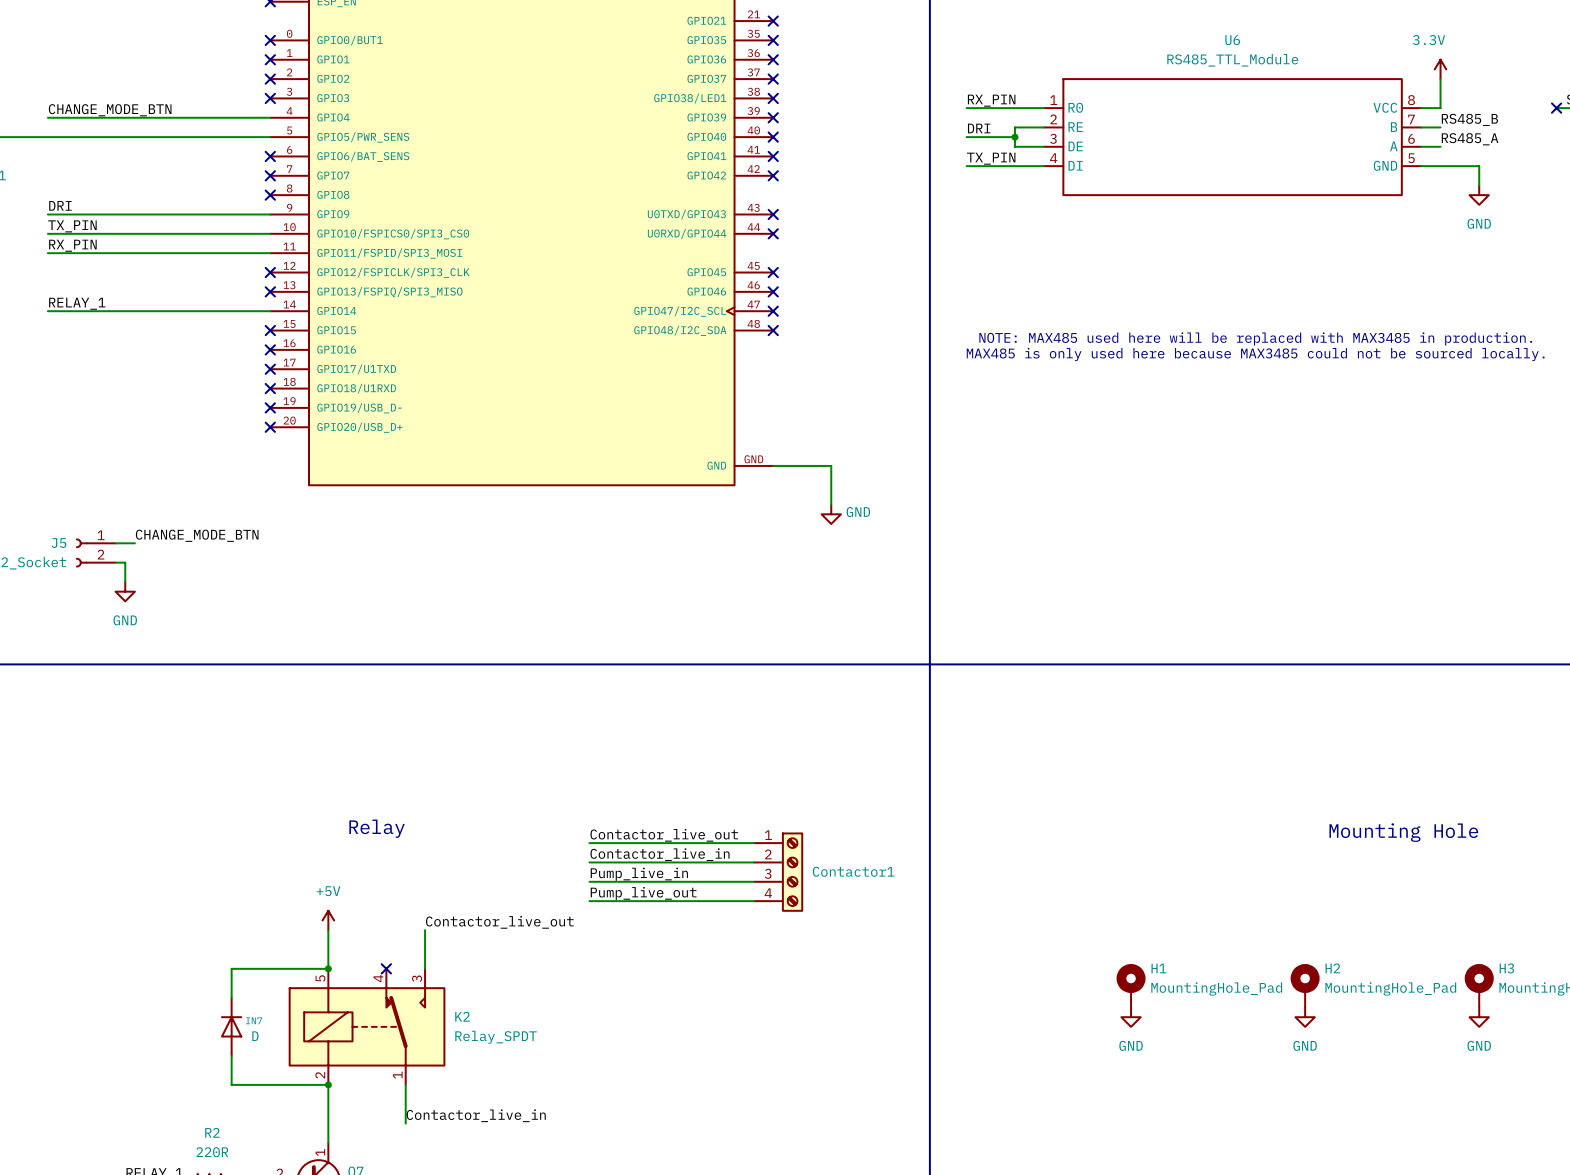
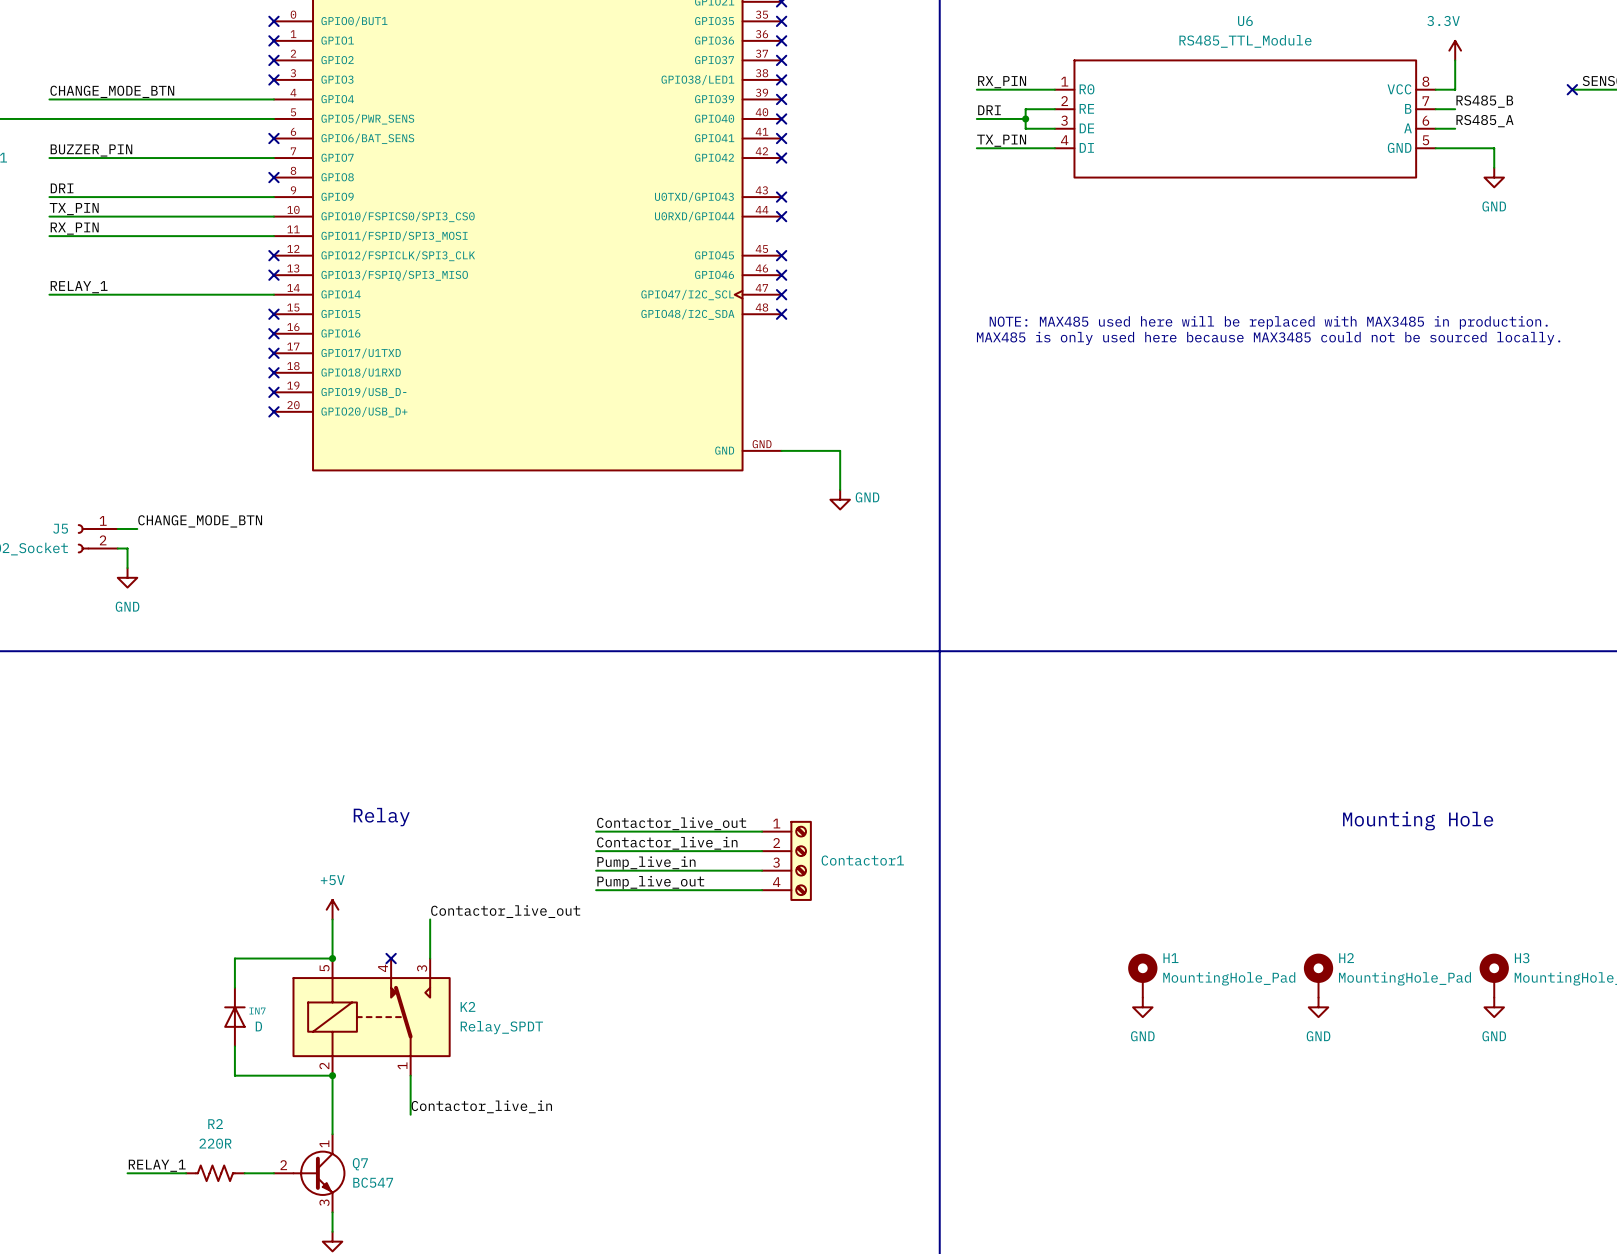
label: none -> BUZZER_PIN (91, 150)
wire: none -> (49, 158) (273, 158)
no-connect mark: (270, 175) -> none

